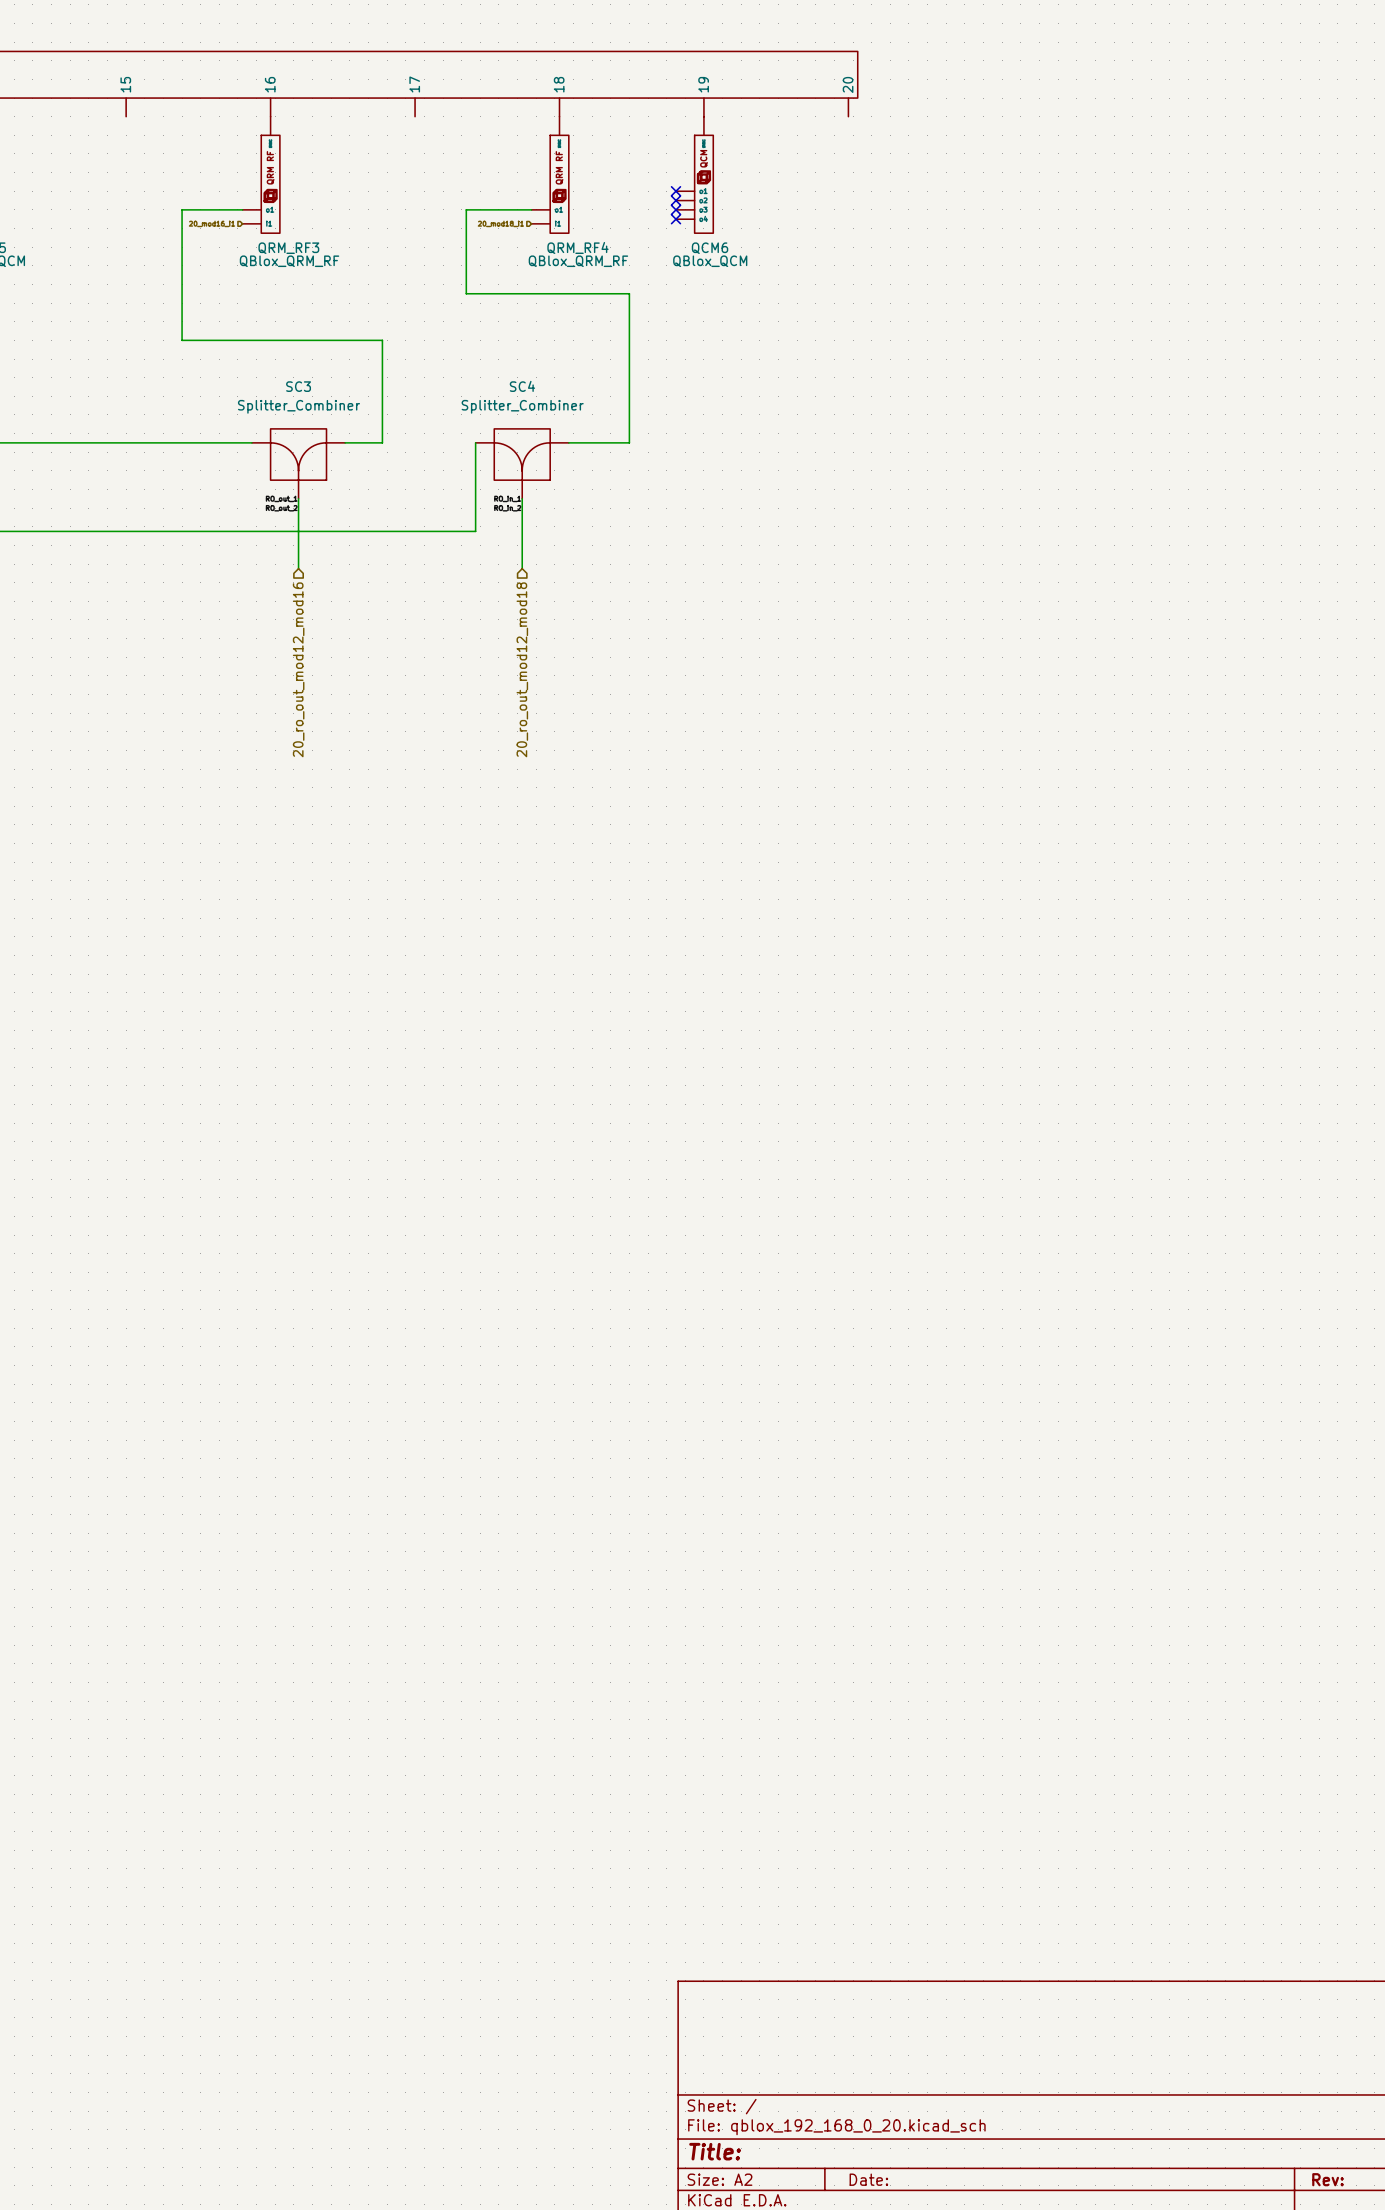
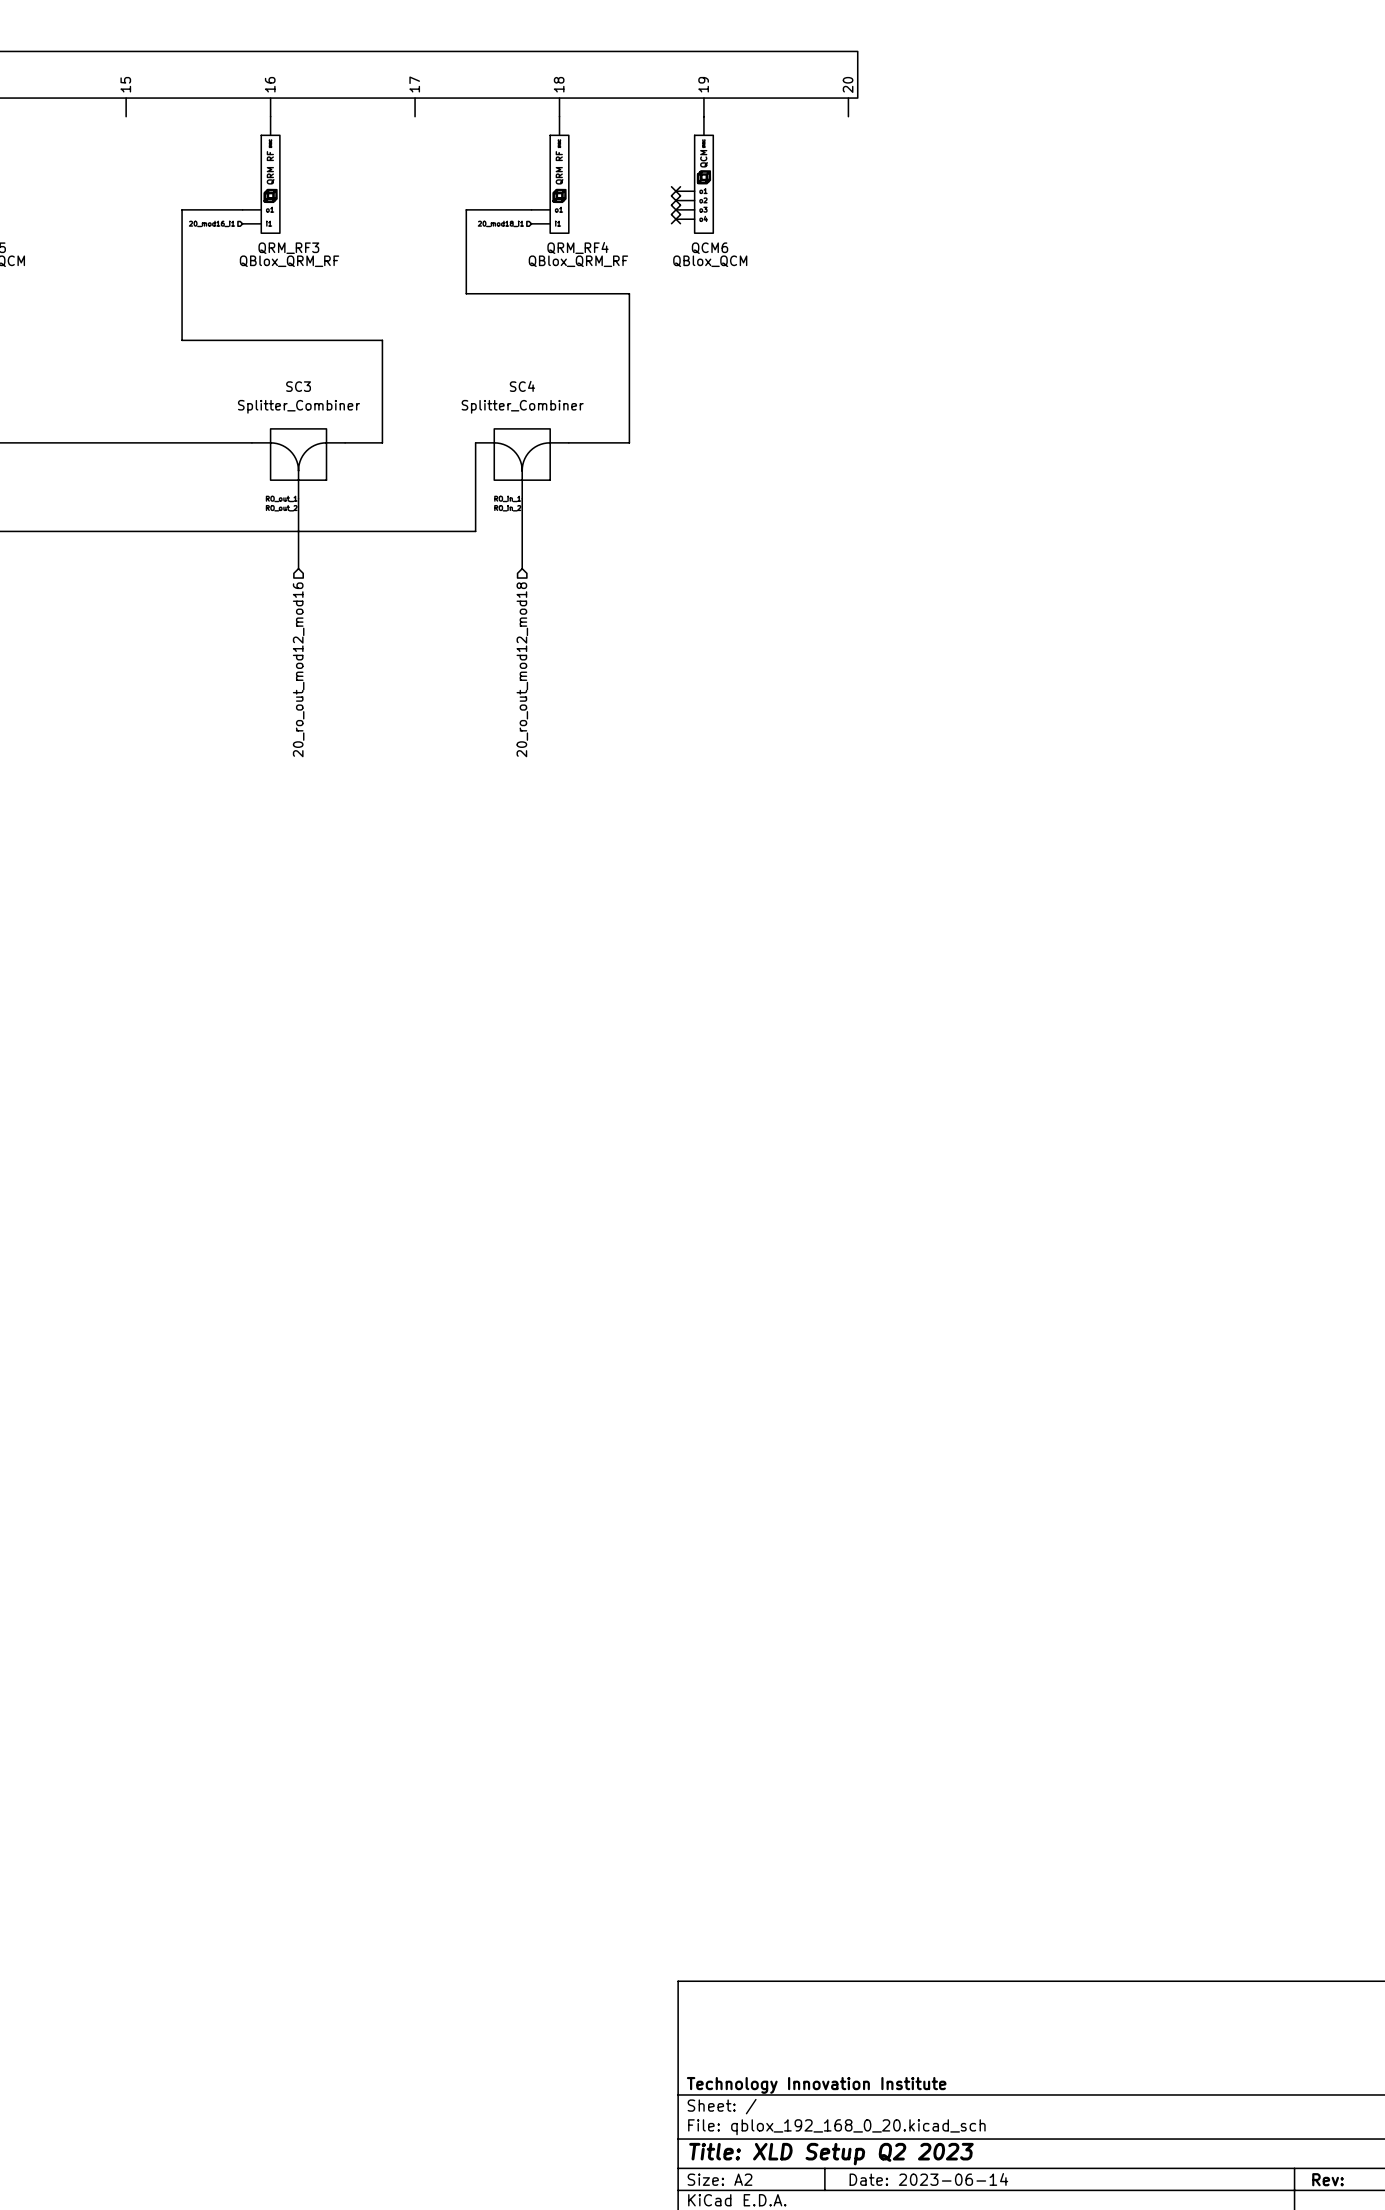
title block: none -> Technology Innovation Institute (816, 2085)
title block: Title: (715, 2151) -> Title: XLD Setup Q2 2023 (831, 2154)
title block: Date: (868, 2179) -> Date: 2023-06-14 (928, 2179)

